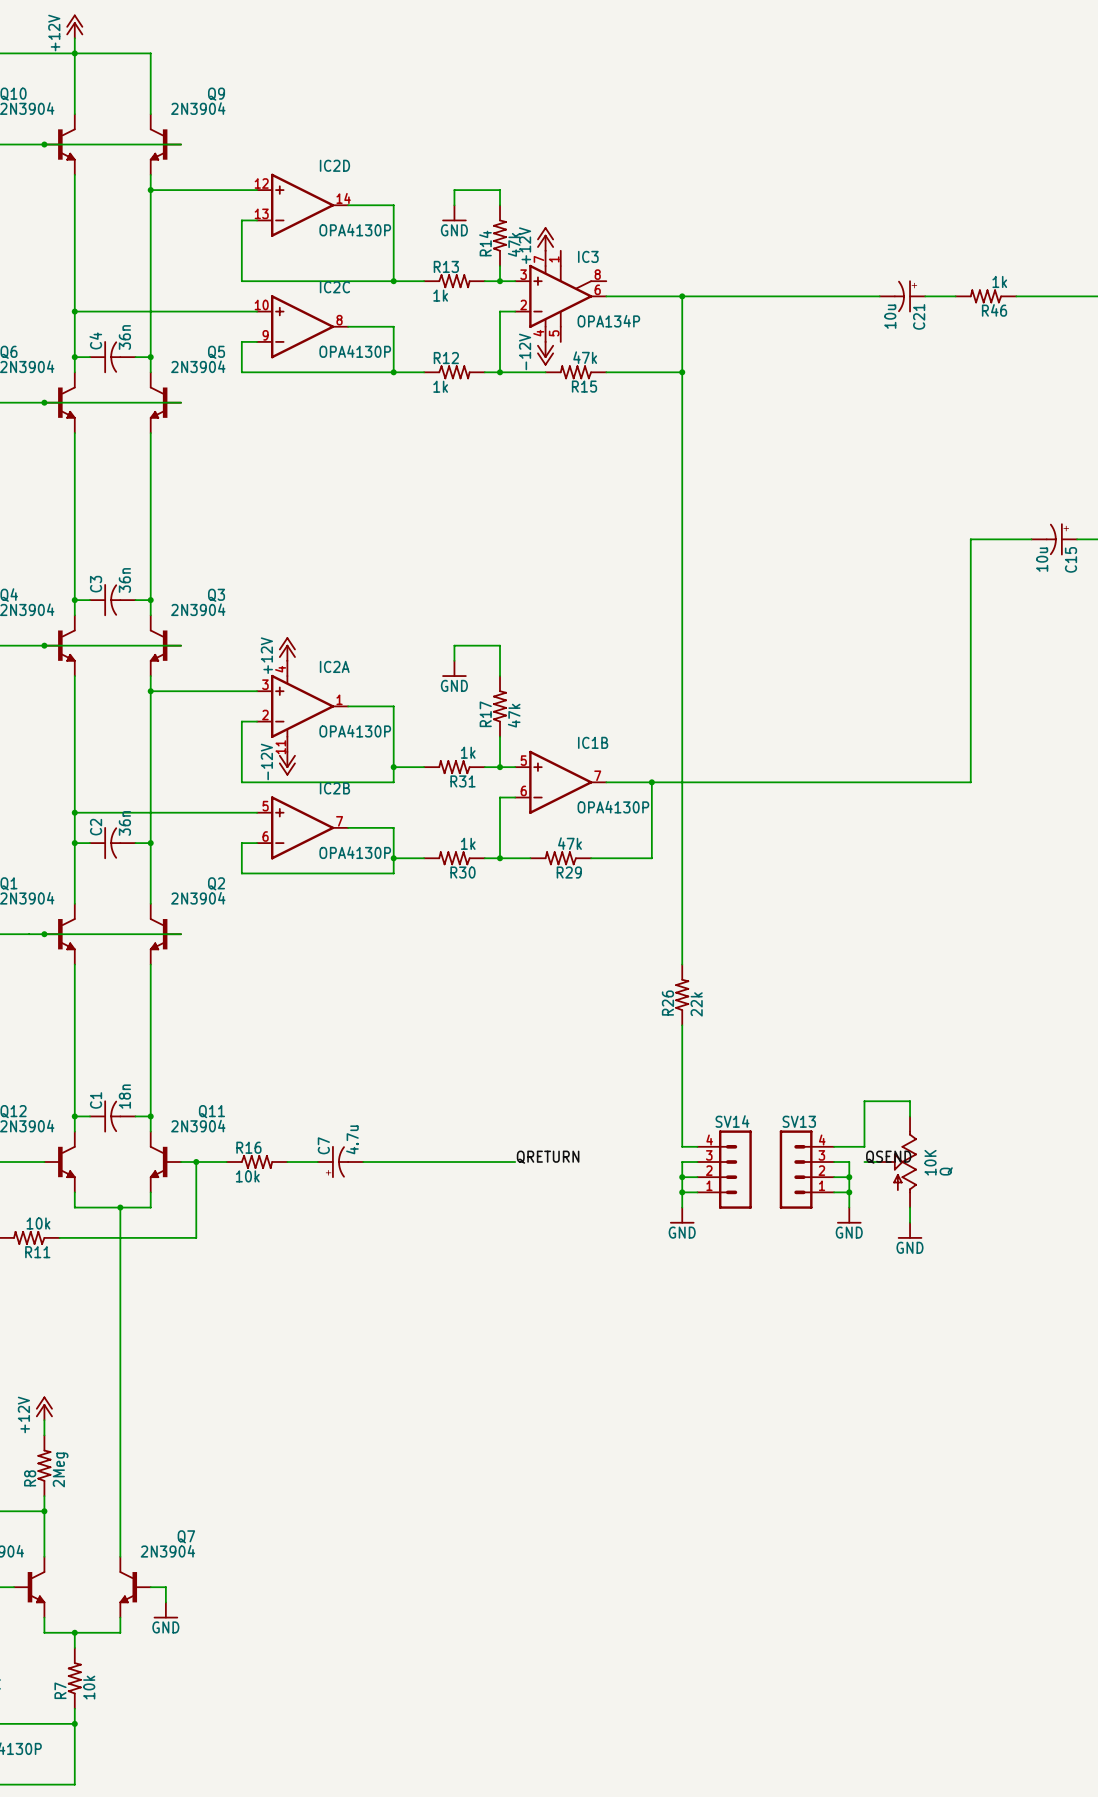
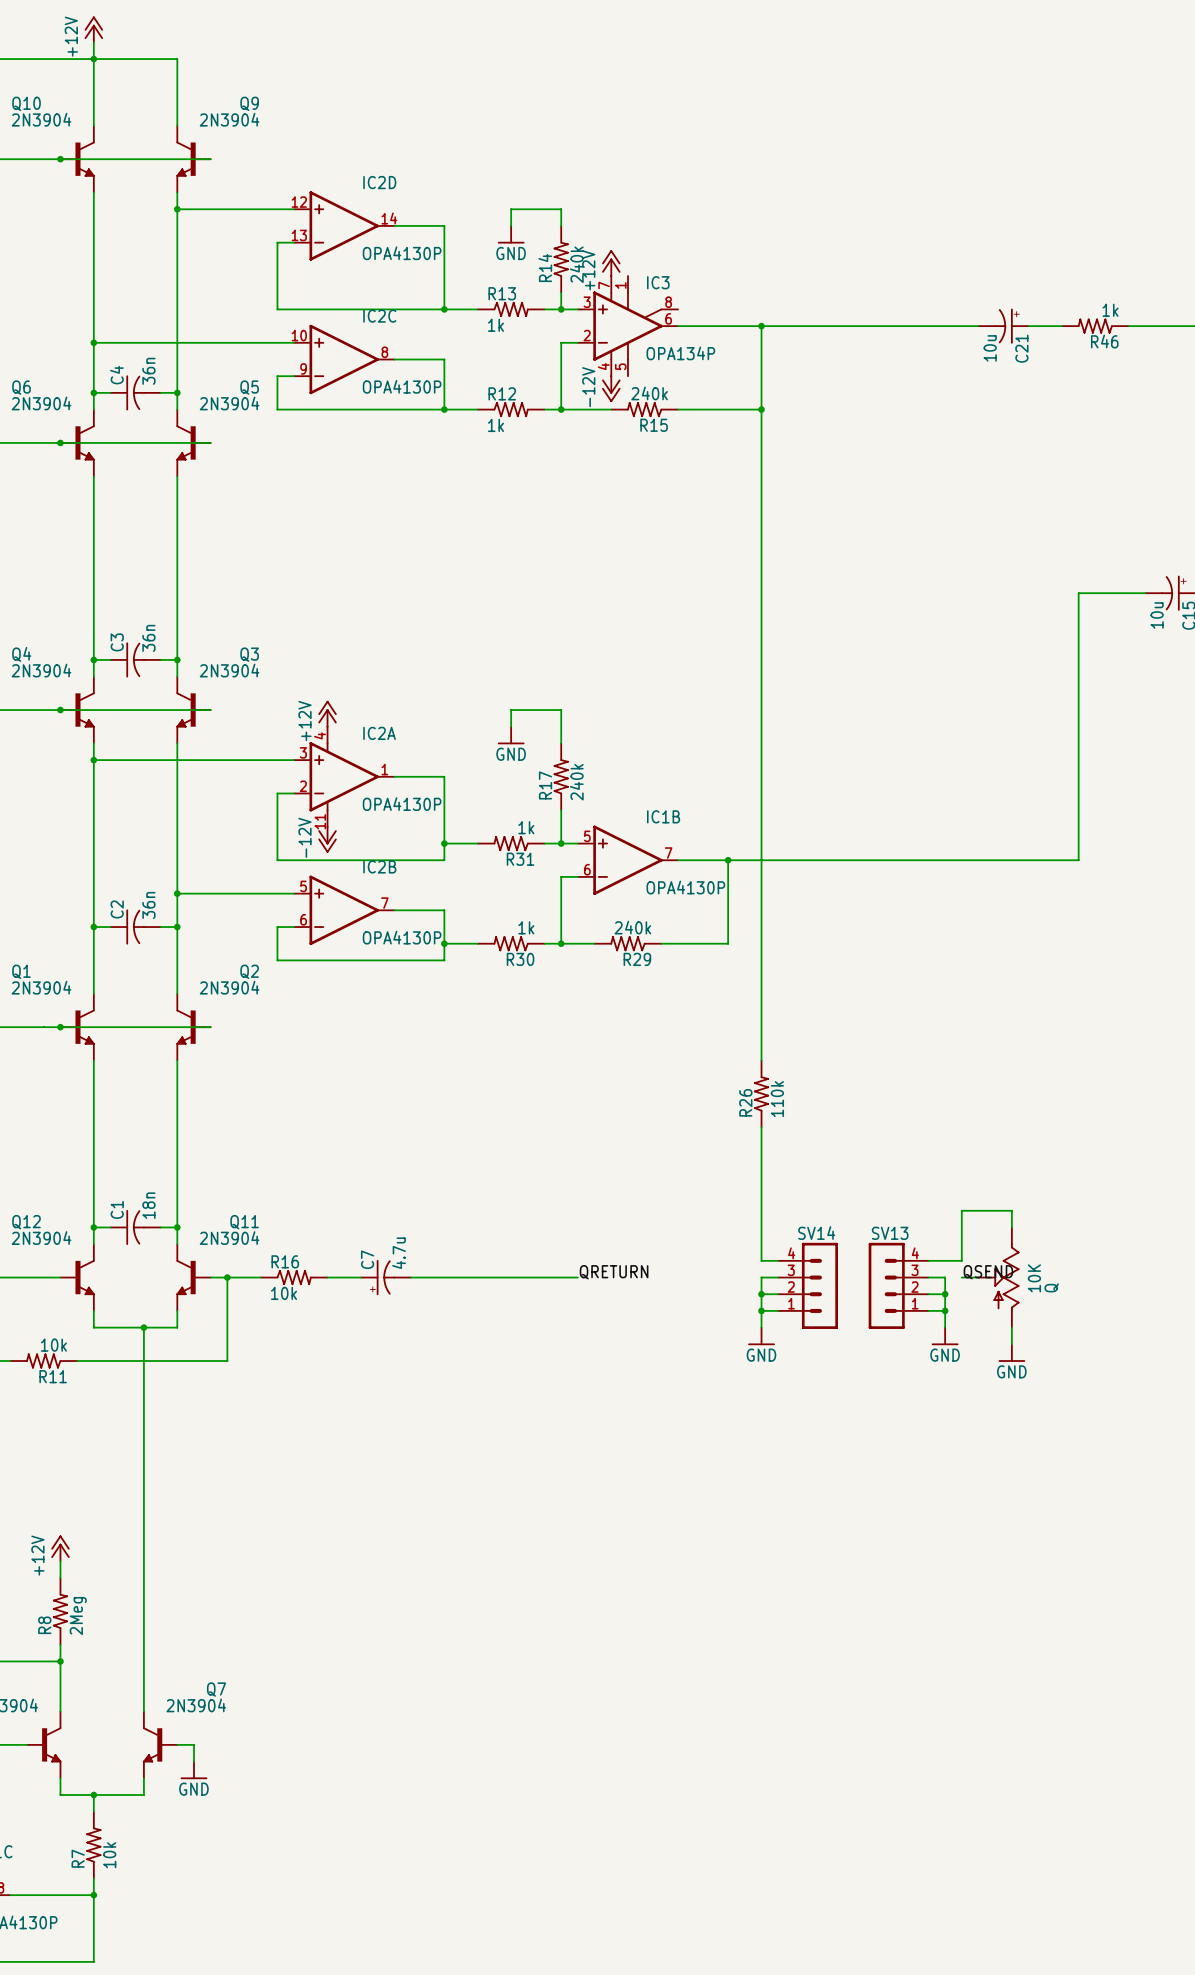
R14 value: 47k (514, 244) -> 240k (576, 264)
R15 value: 47k (585, 357) -> 240k (649, 393)
junction: none -> (93, 760)
junction: (150, 691) -> none
R17 value: 47k (514, 715) -> 240k (576, 782)
wire: (74, 812) (150, 812) -> (93, 760) (177, 760)
junction: (74, 812) -> none
junction: none -> (177, 893)
R29 value: 47k (569, 843) -> 240k (632, 927)
R26 value: 22k (696, 1004) -> 110k (777, 1099)

